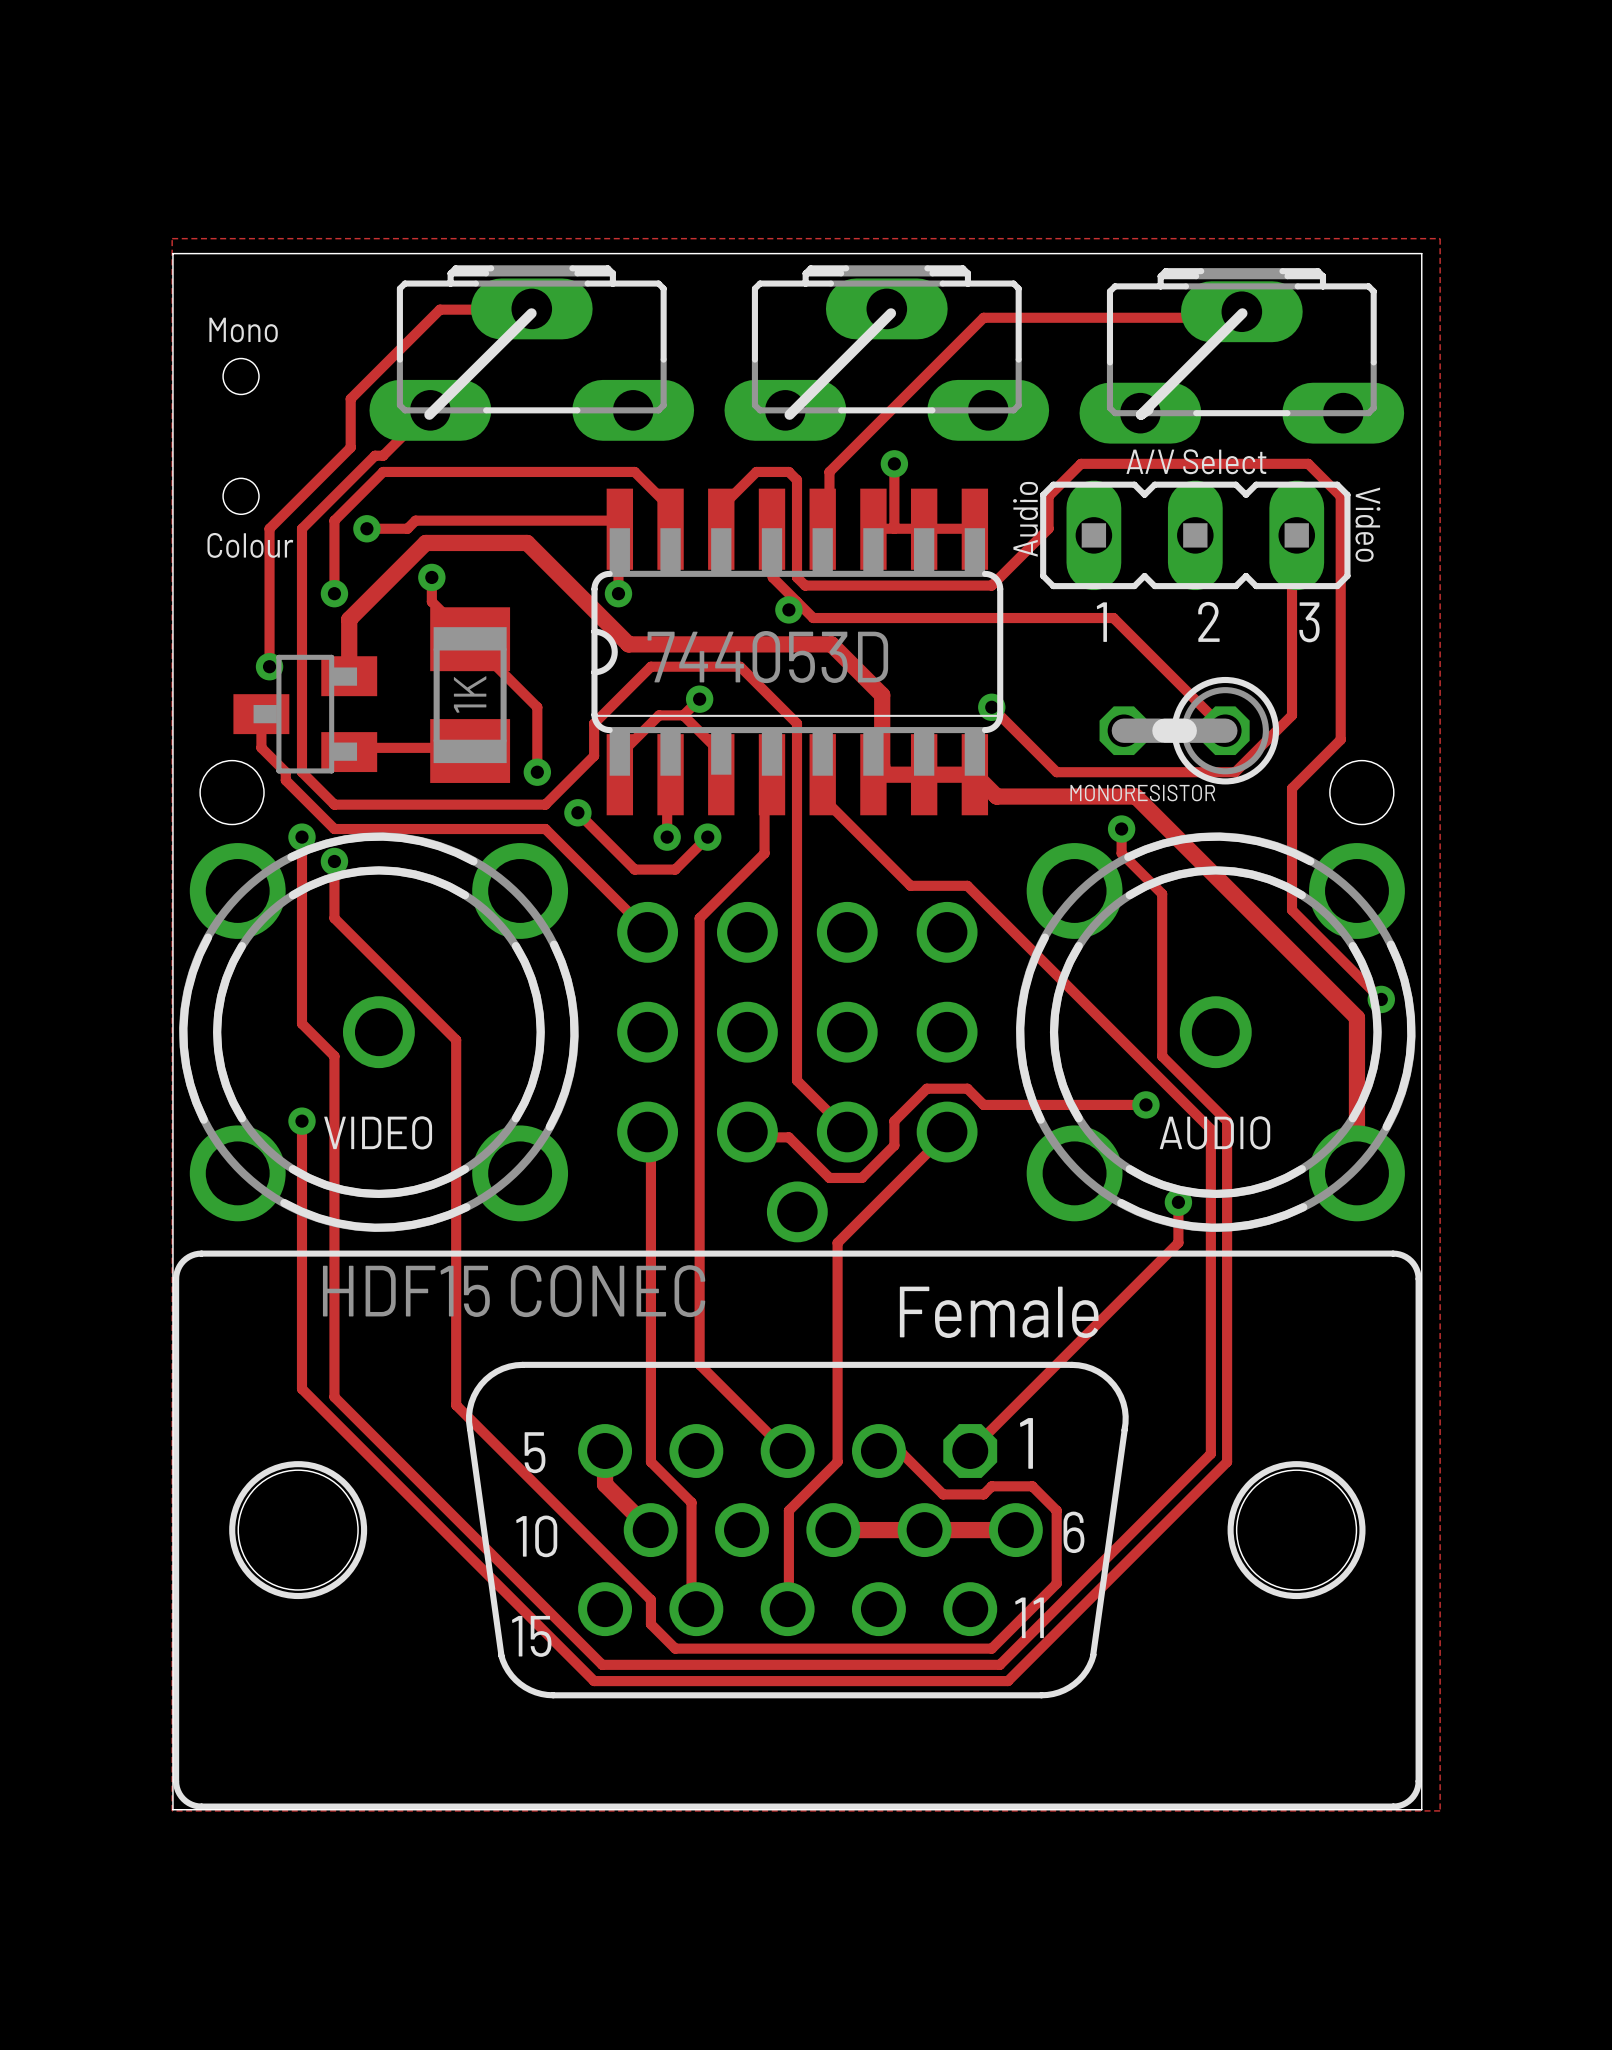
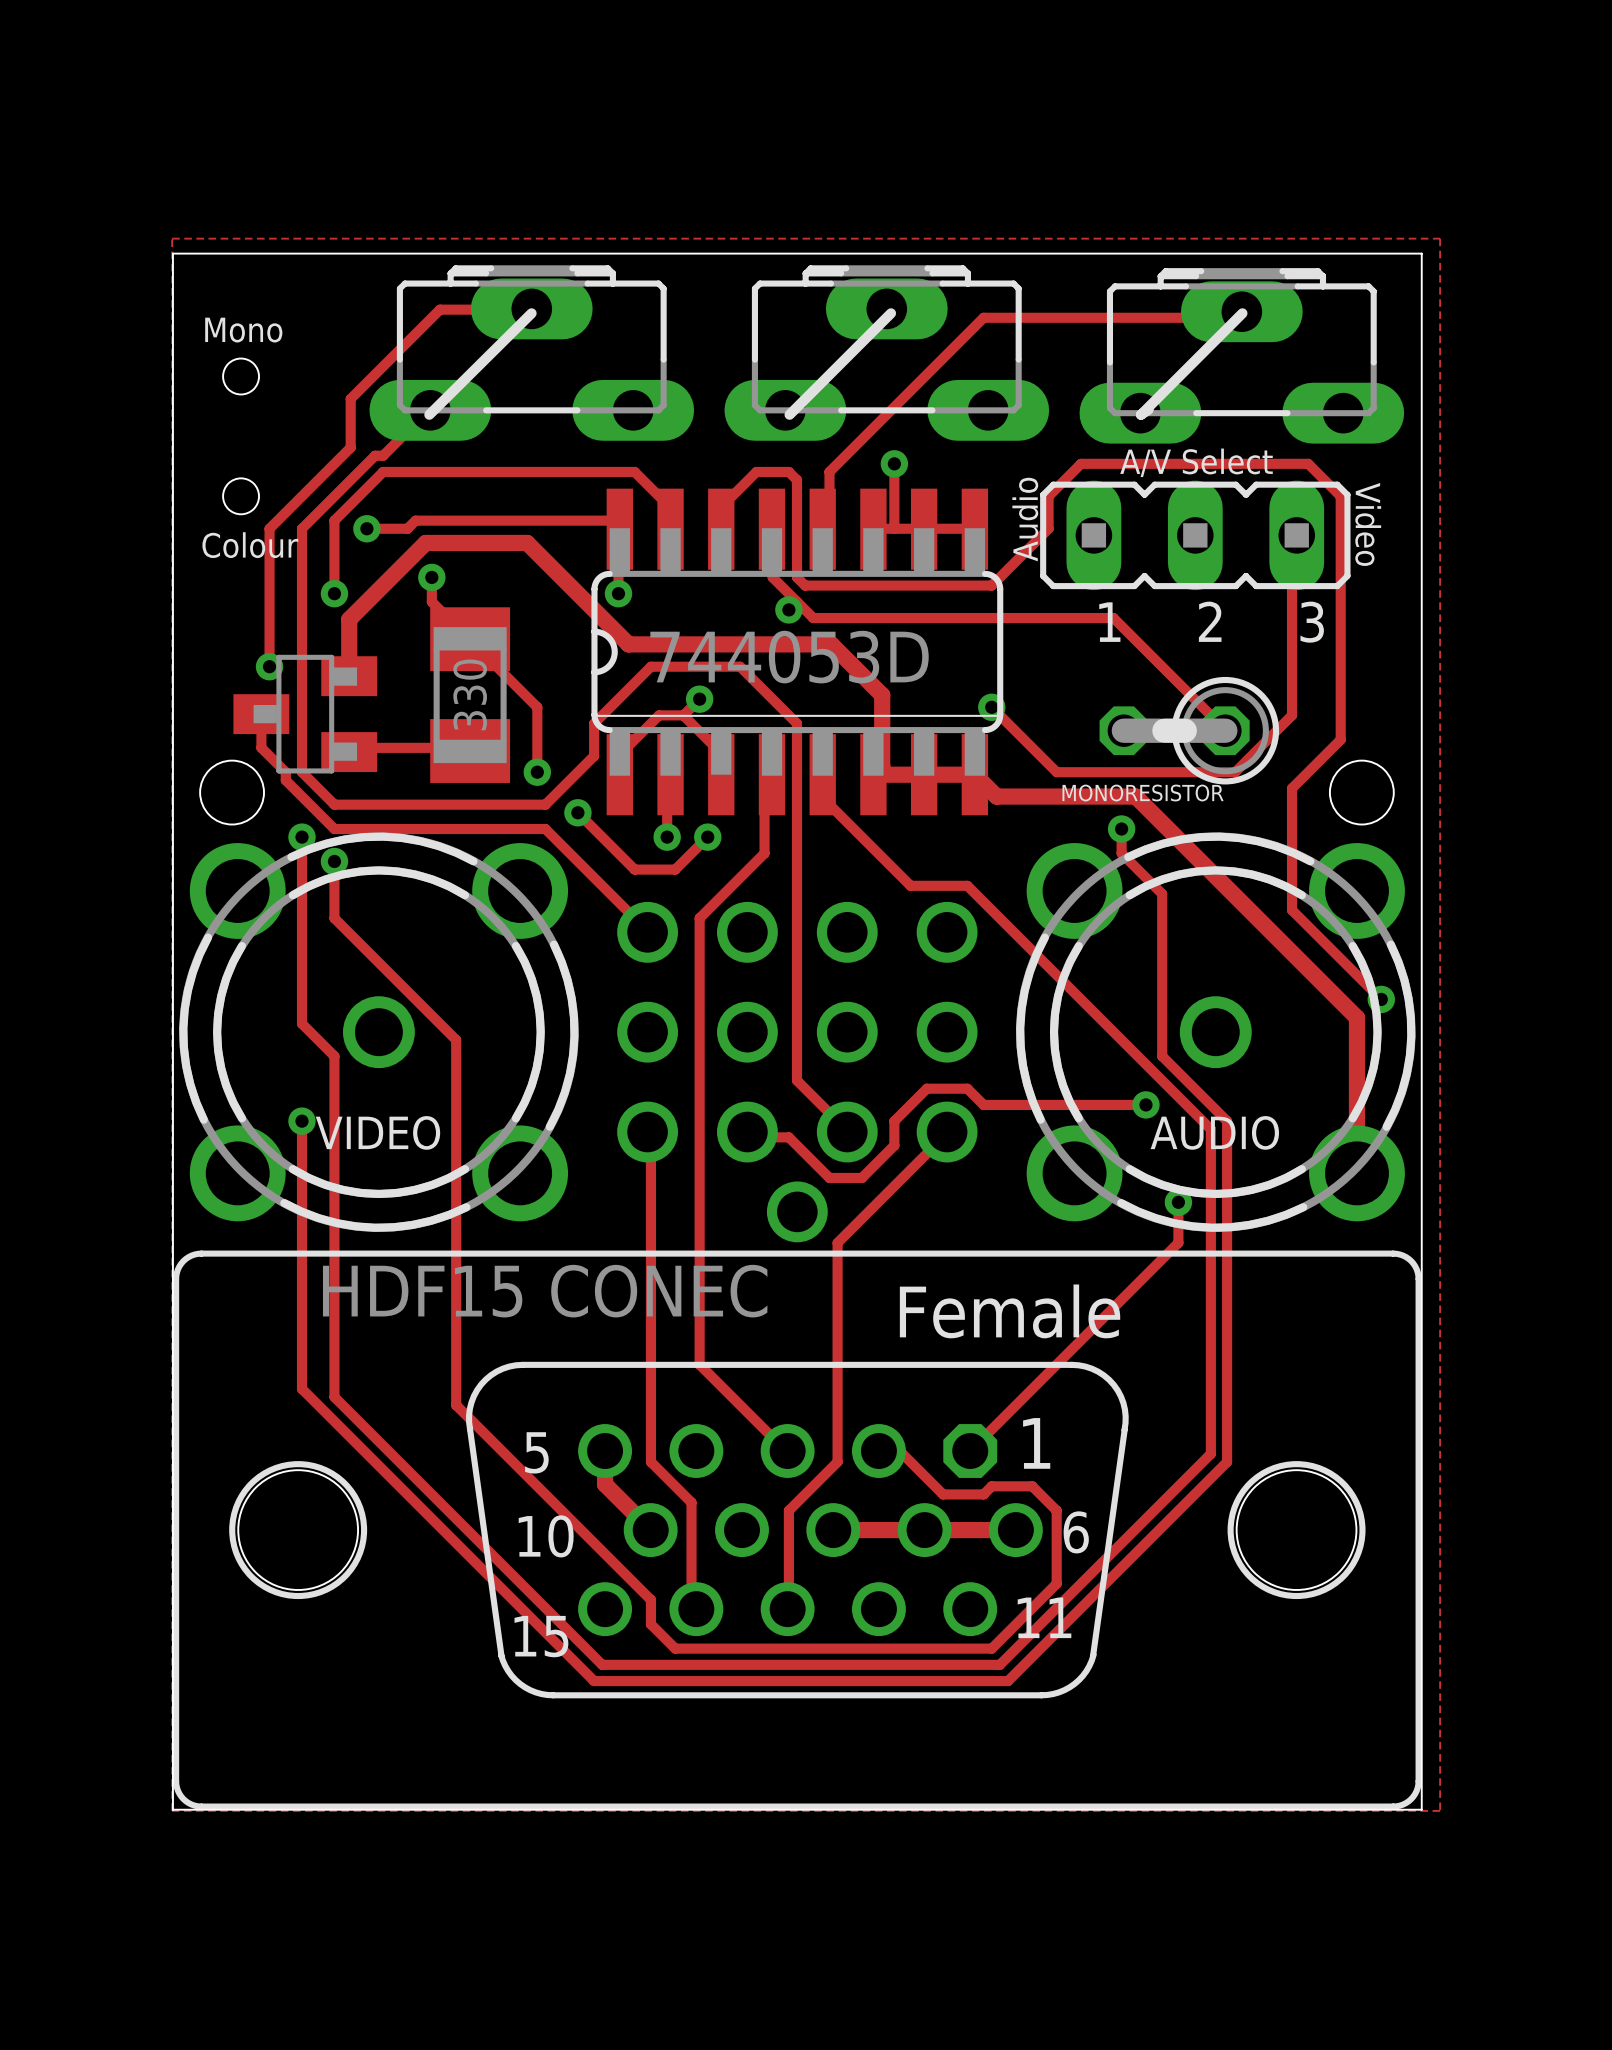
part value: 1K (470, 694) -> 330 (470, 694)

